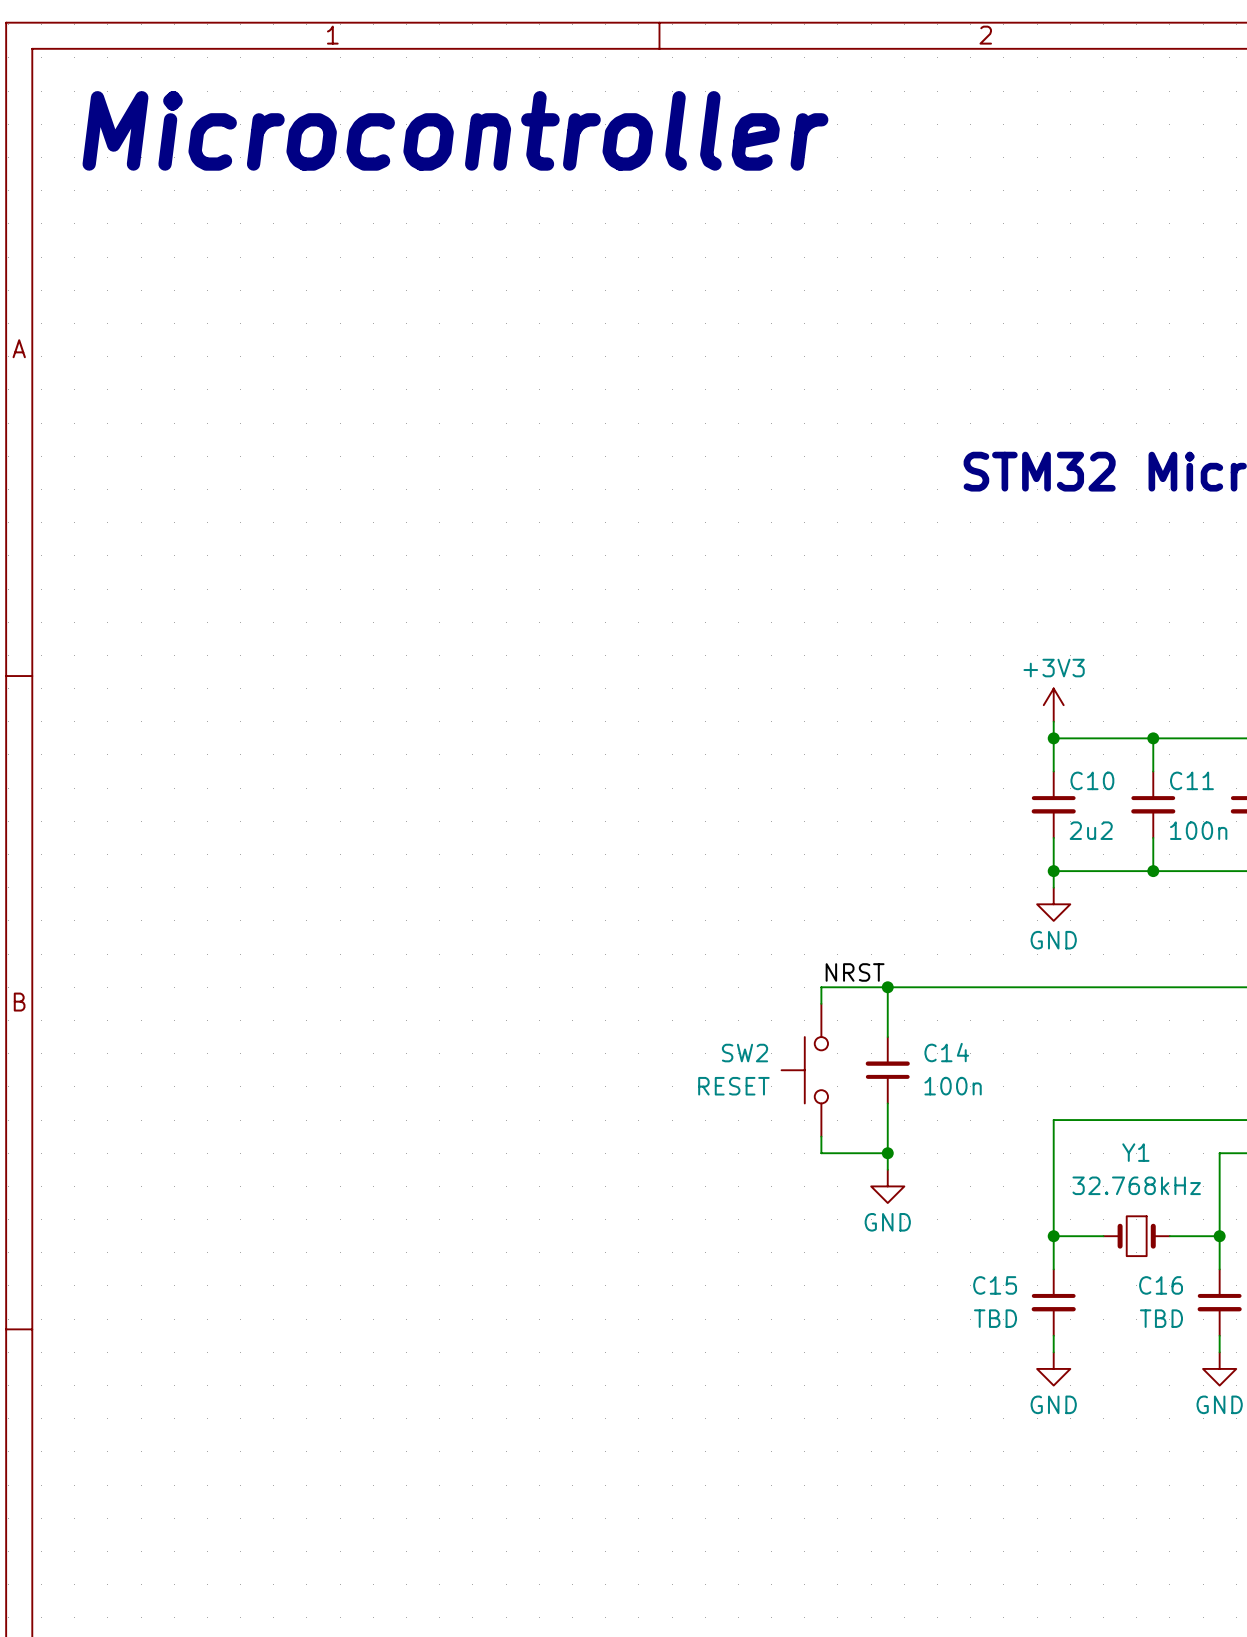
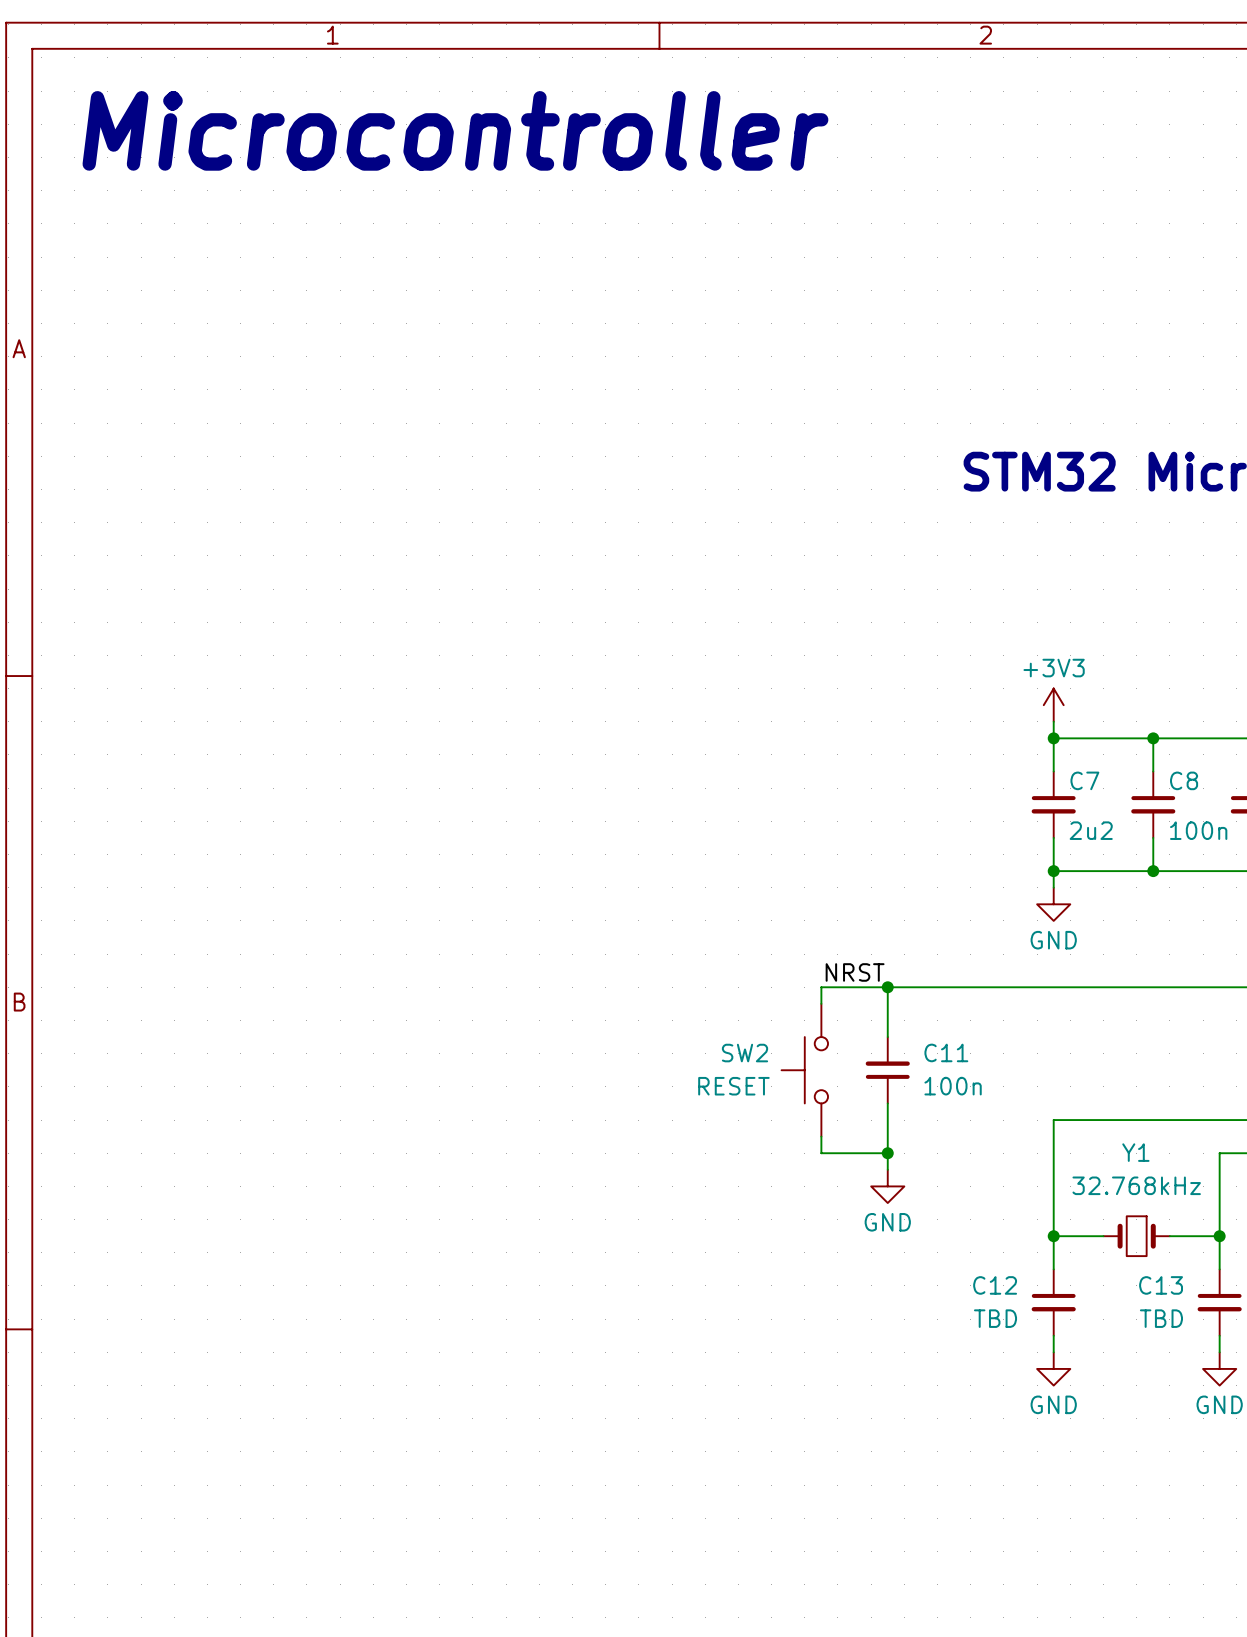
C10 name: C10 (1092, 780) -> C7 (1084, 780)
C11 name: C11 (1191, 780) -> C8 (1184, 780)
C14 name: C14 (946, 1052) -> C11 (946, 1052)
C15 name: C15 (995, 1285) -> C12 (995, 1285)
C16 name: C16 (1161, 1285) -> C13 (1161, 1285)

